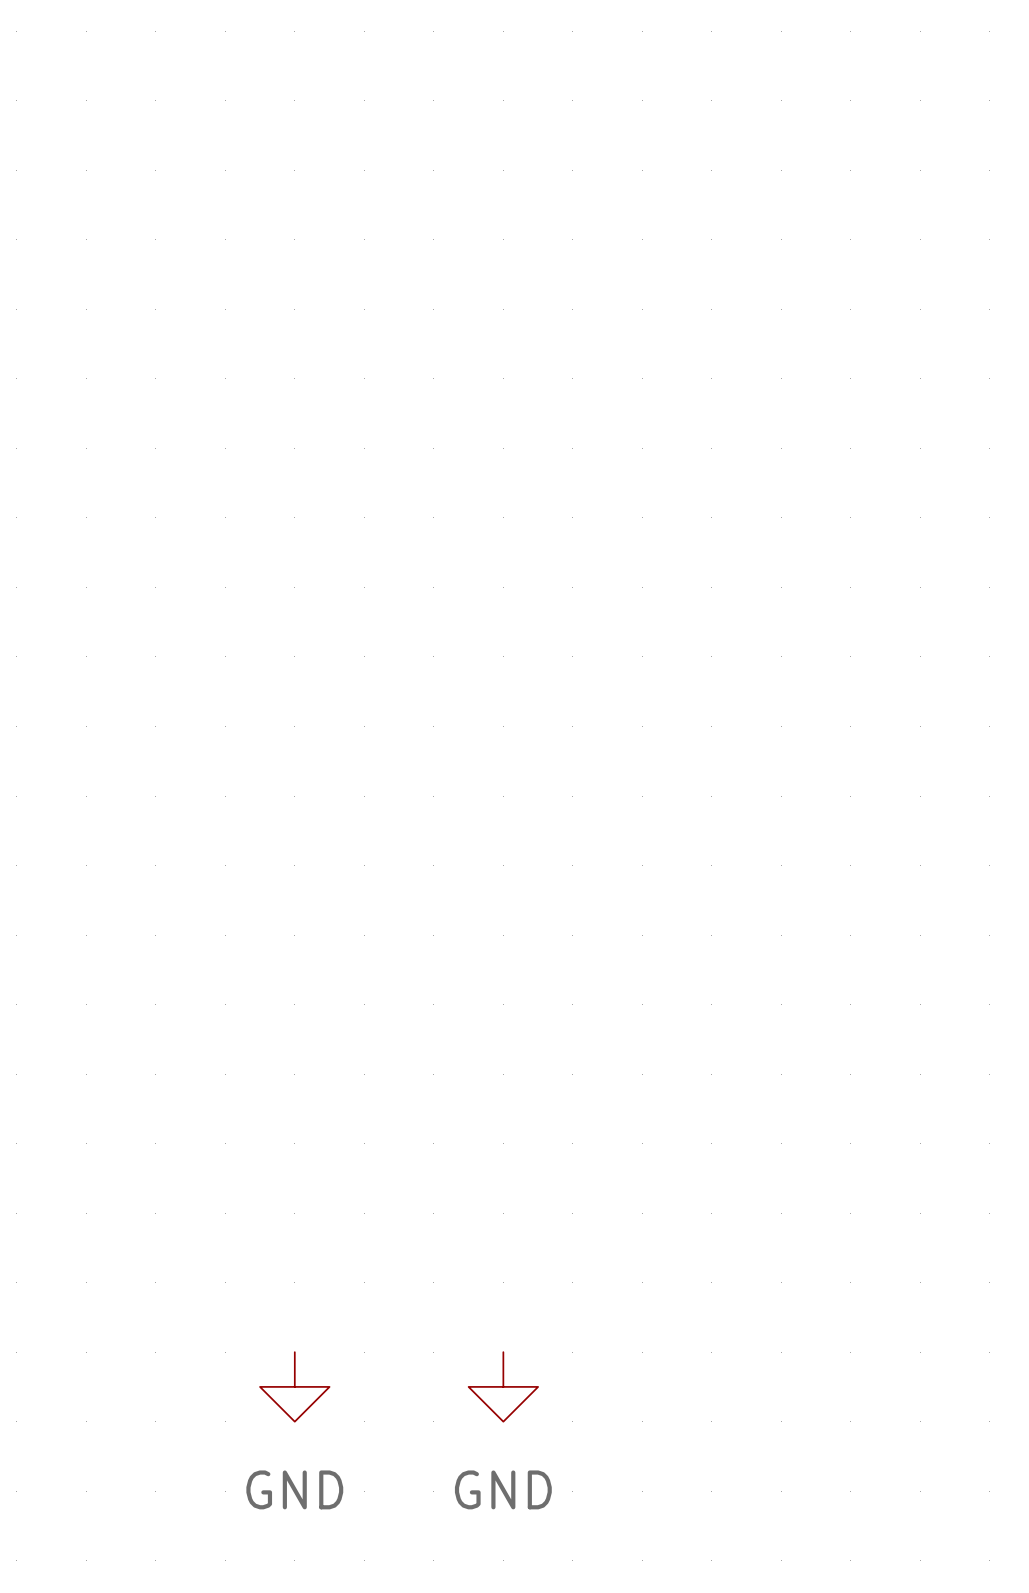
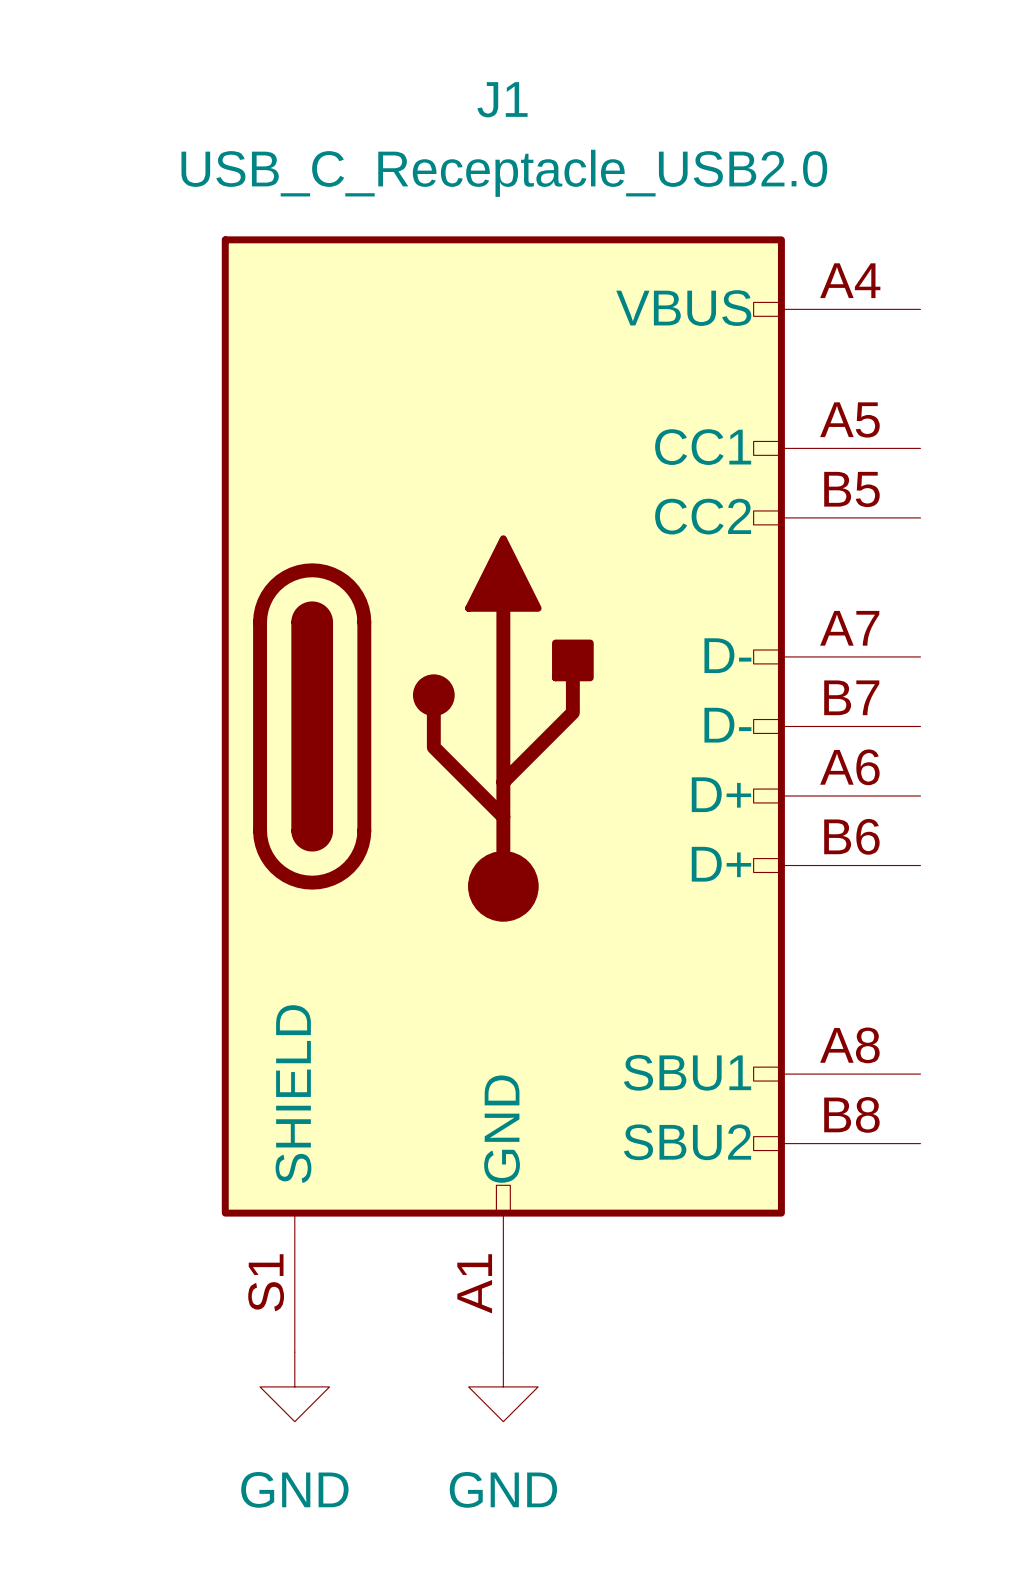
J1: none -> USB_C_Receptacle_USB2.0 (571, 794)

